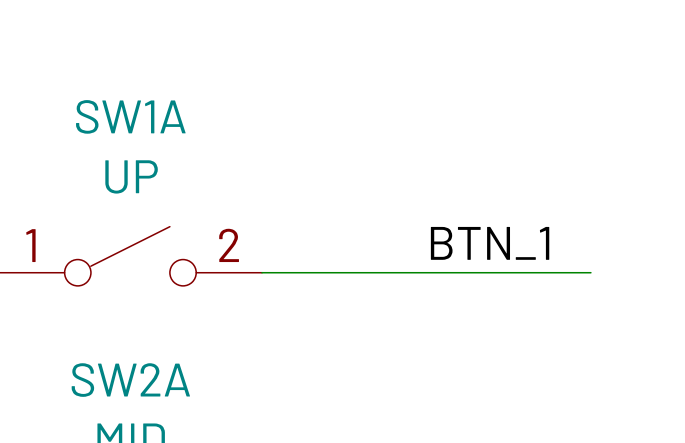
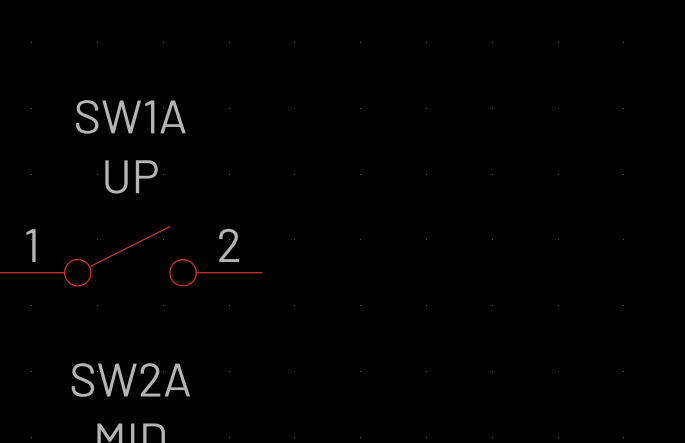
label: BTN_1 (490, 243) -> none
wire: (261, 272) (590, 272) -> none

